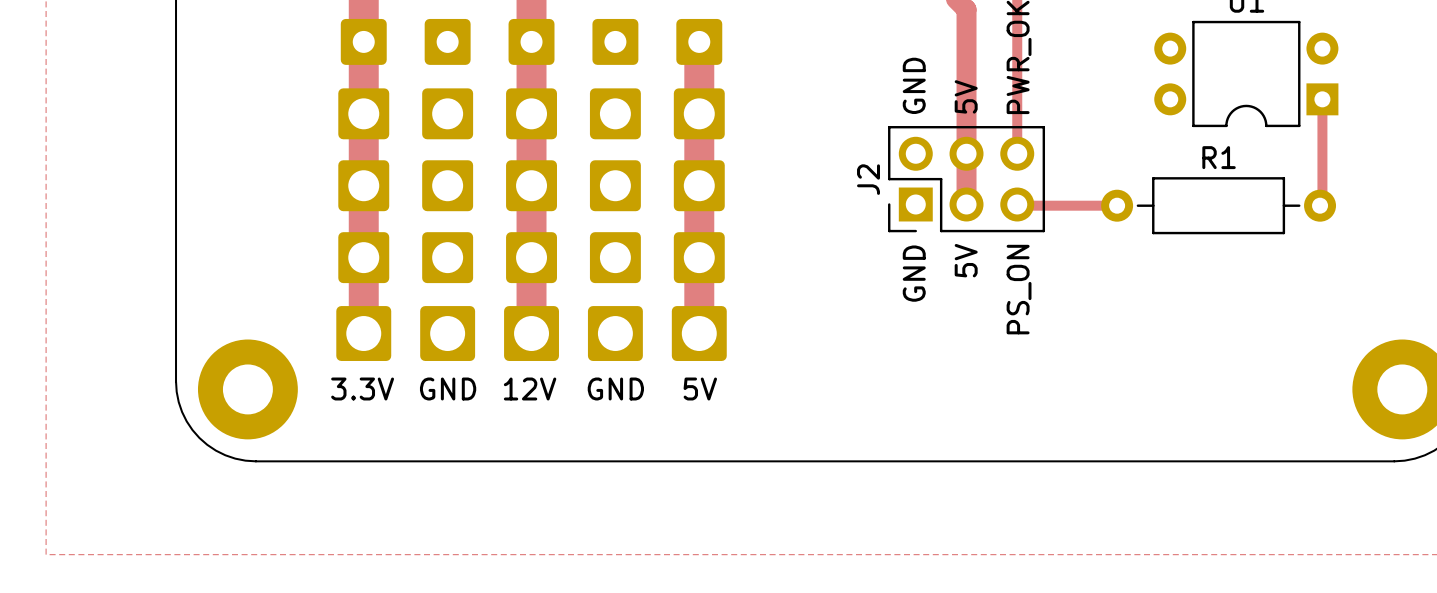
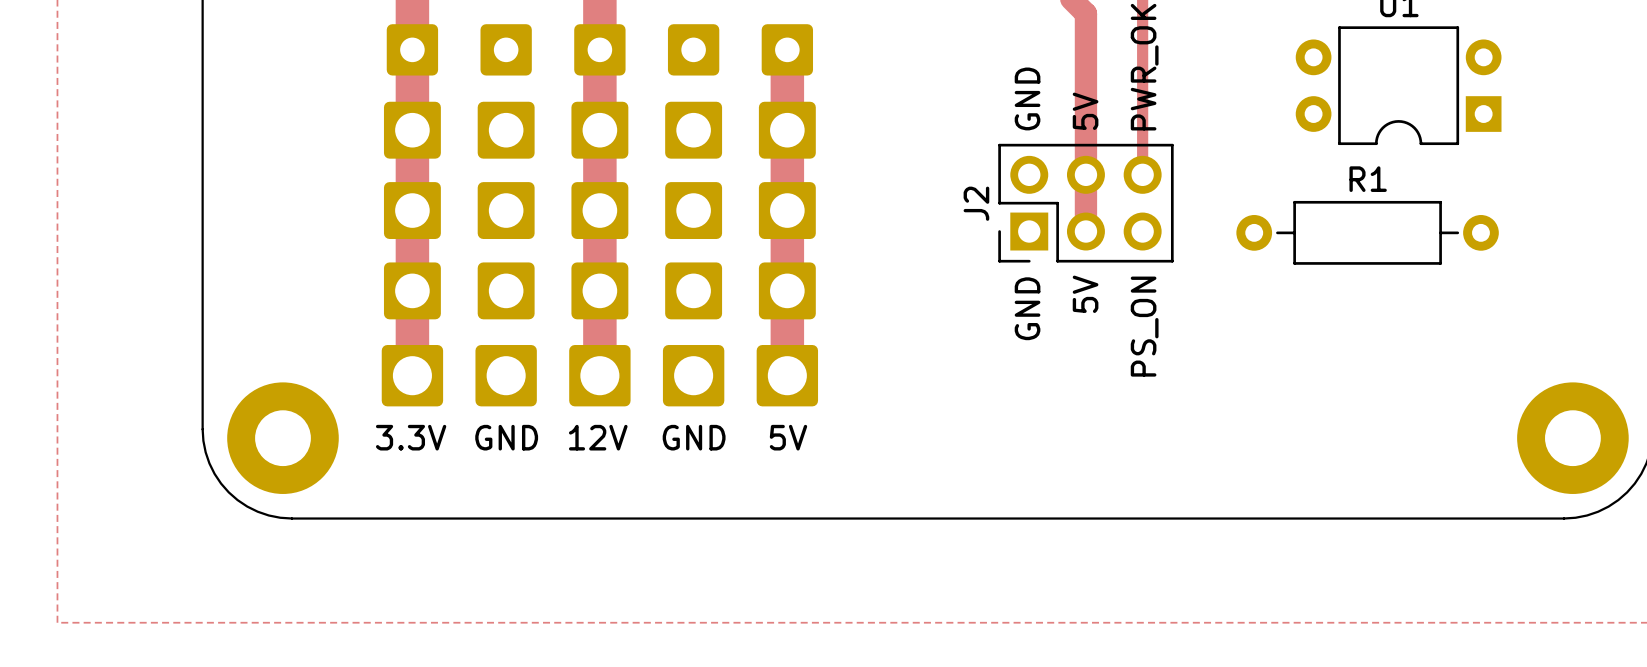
track: (1322, 99) (1322, 203) -> none
track: (1018, 205) (1117, 205) -> none

